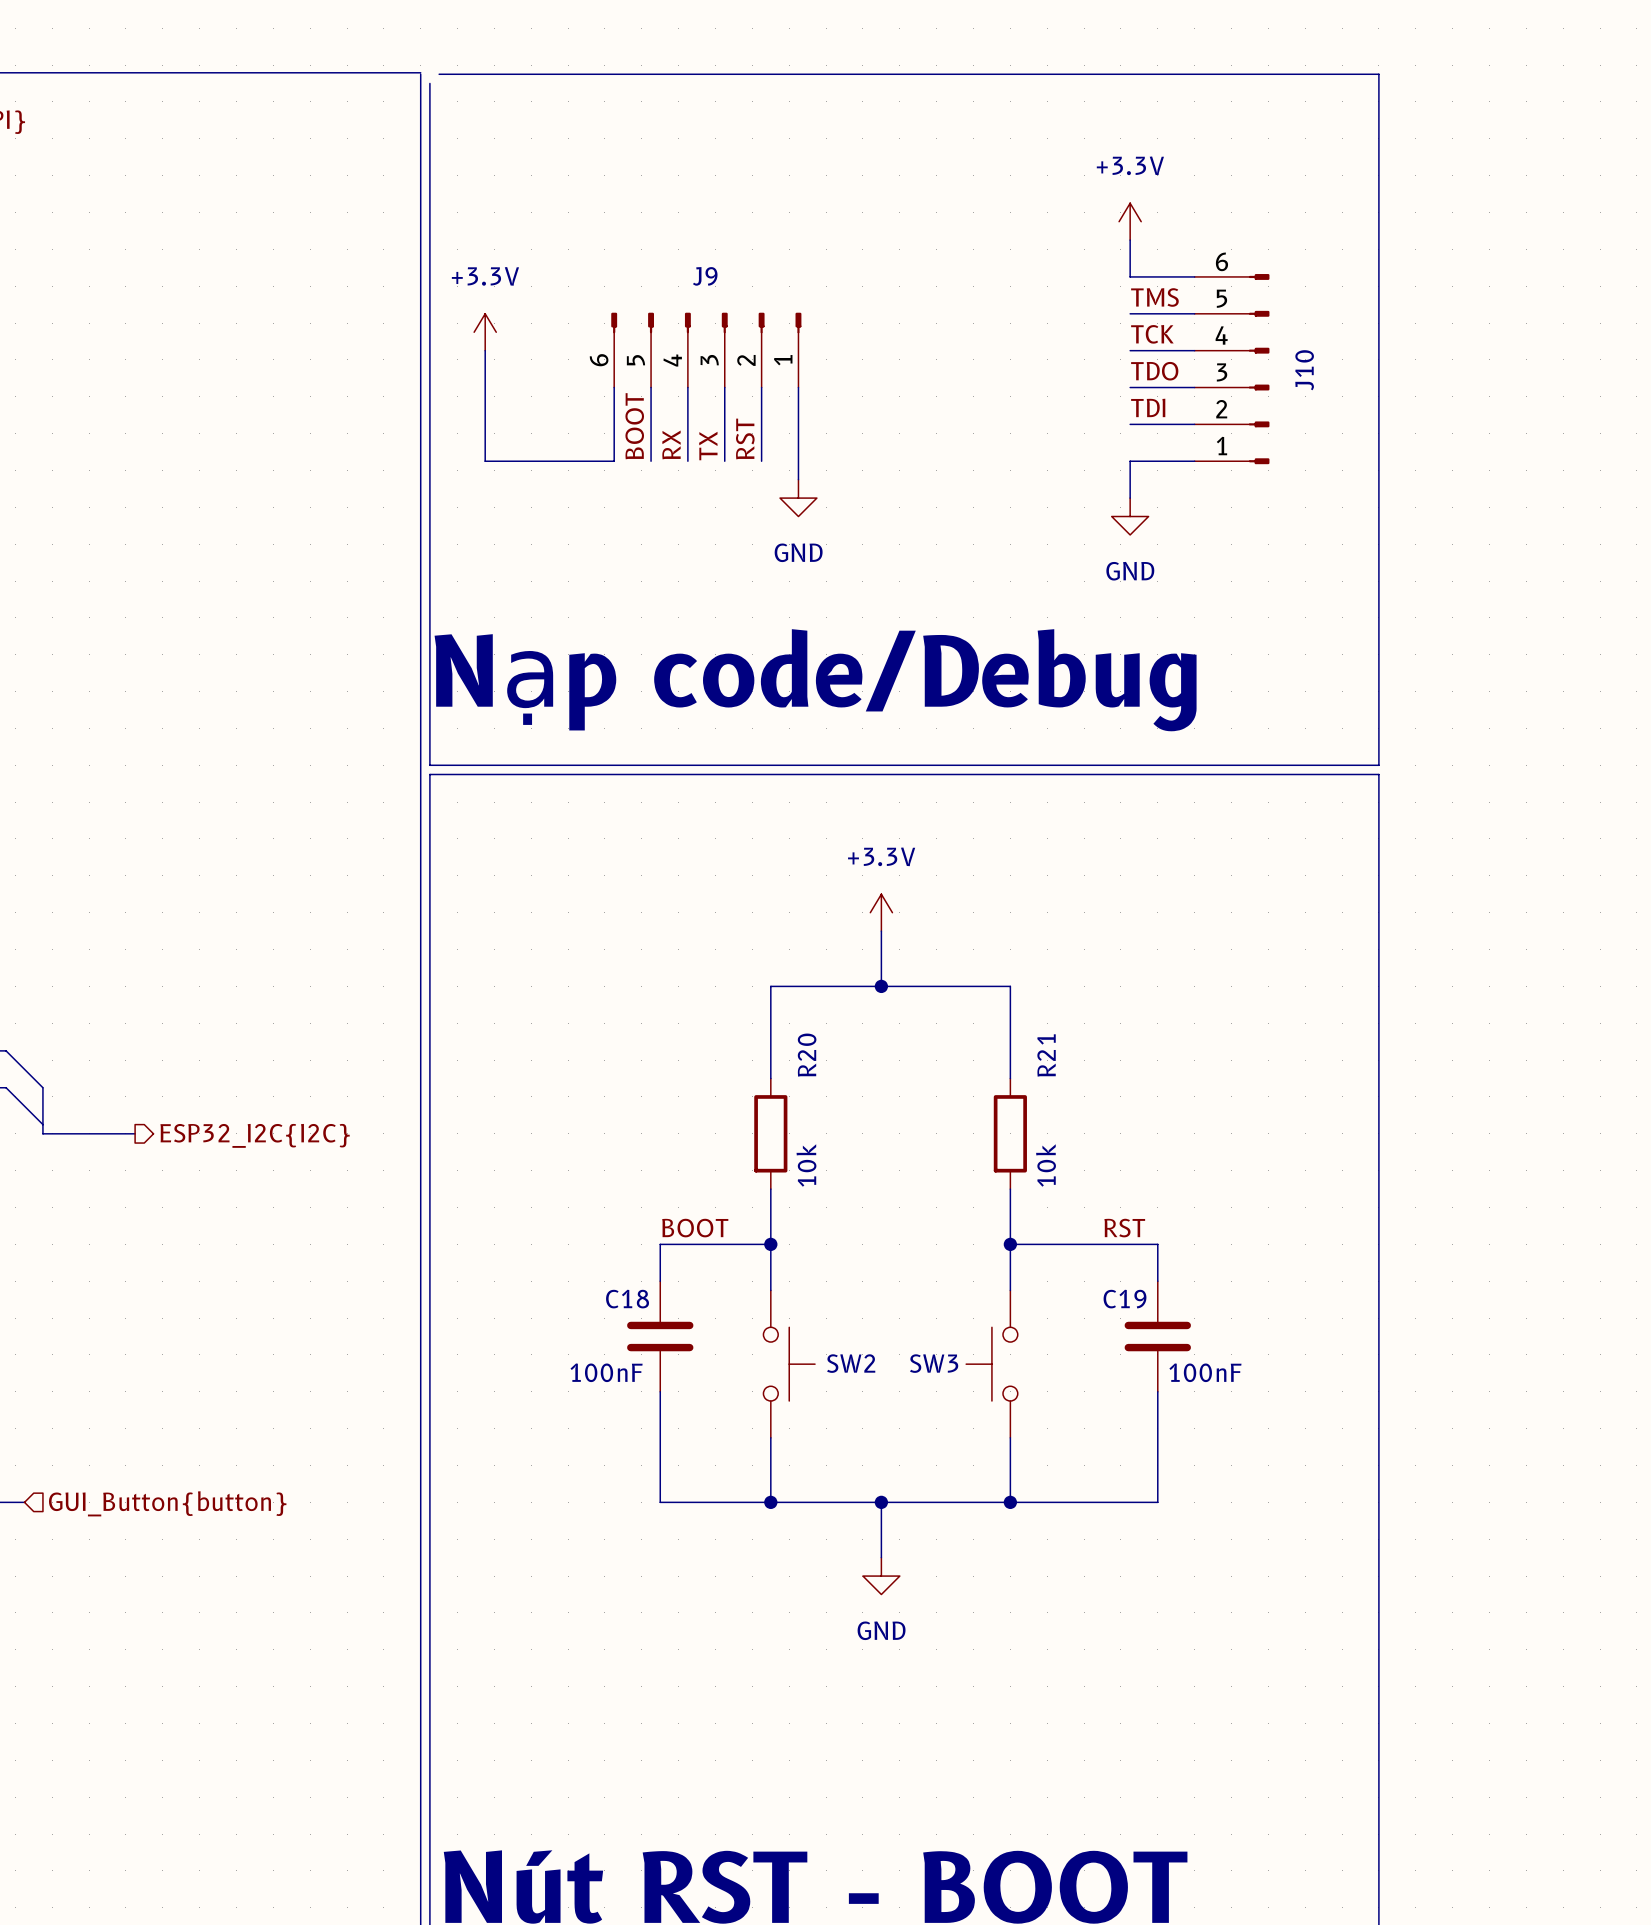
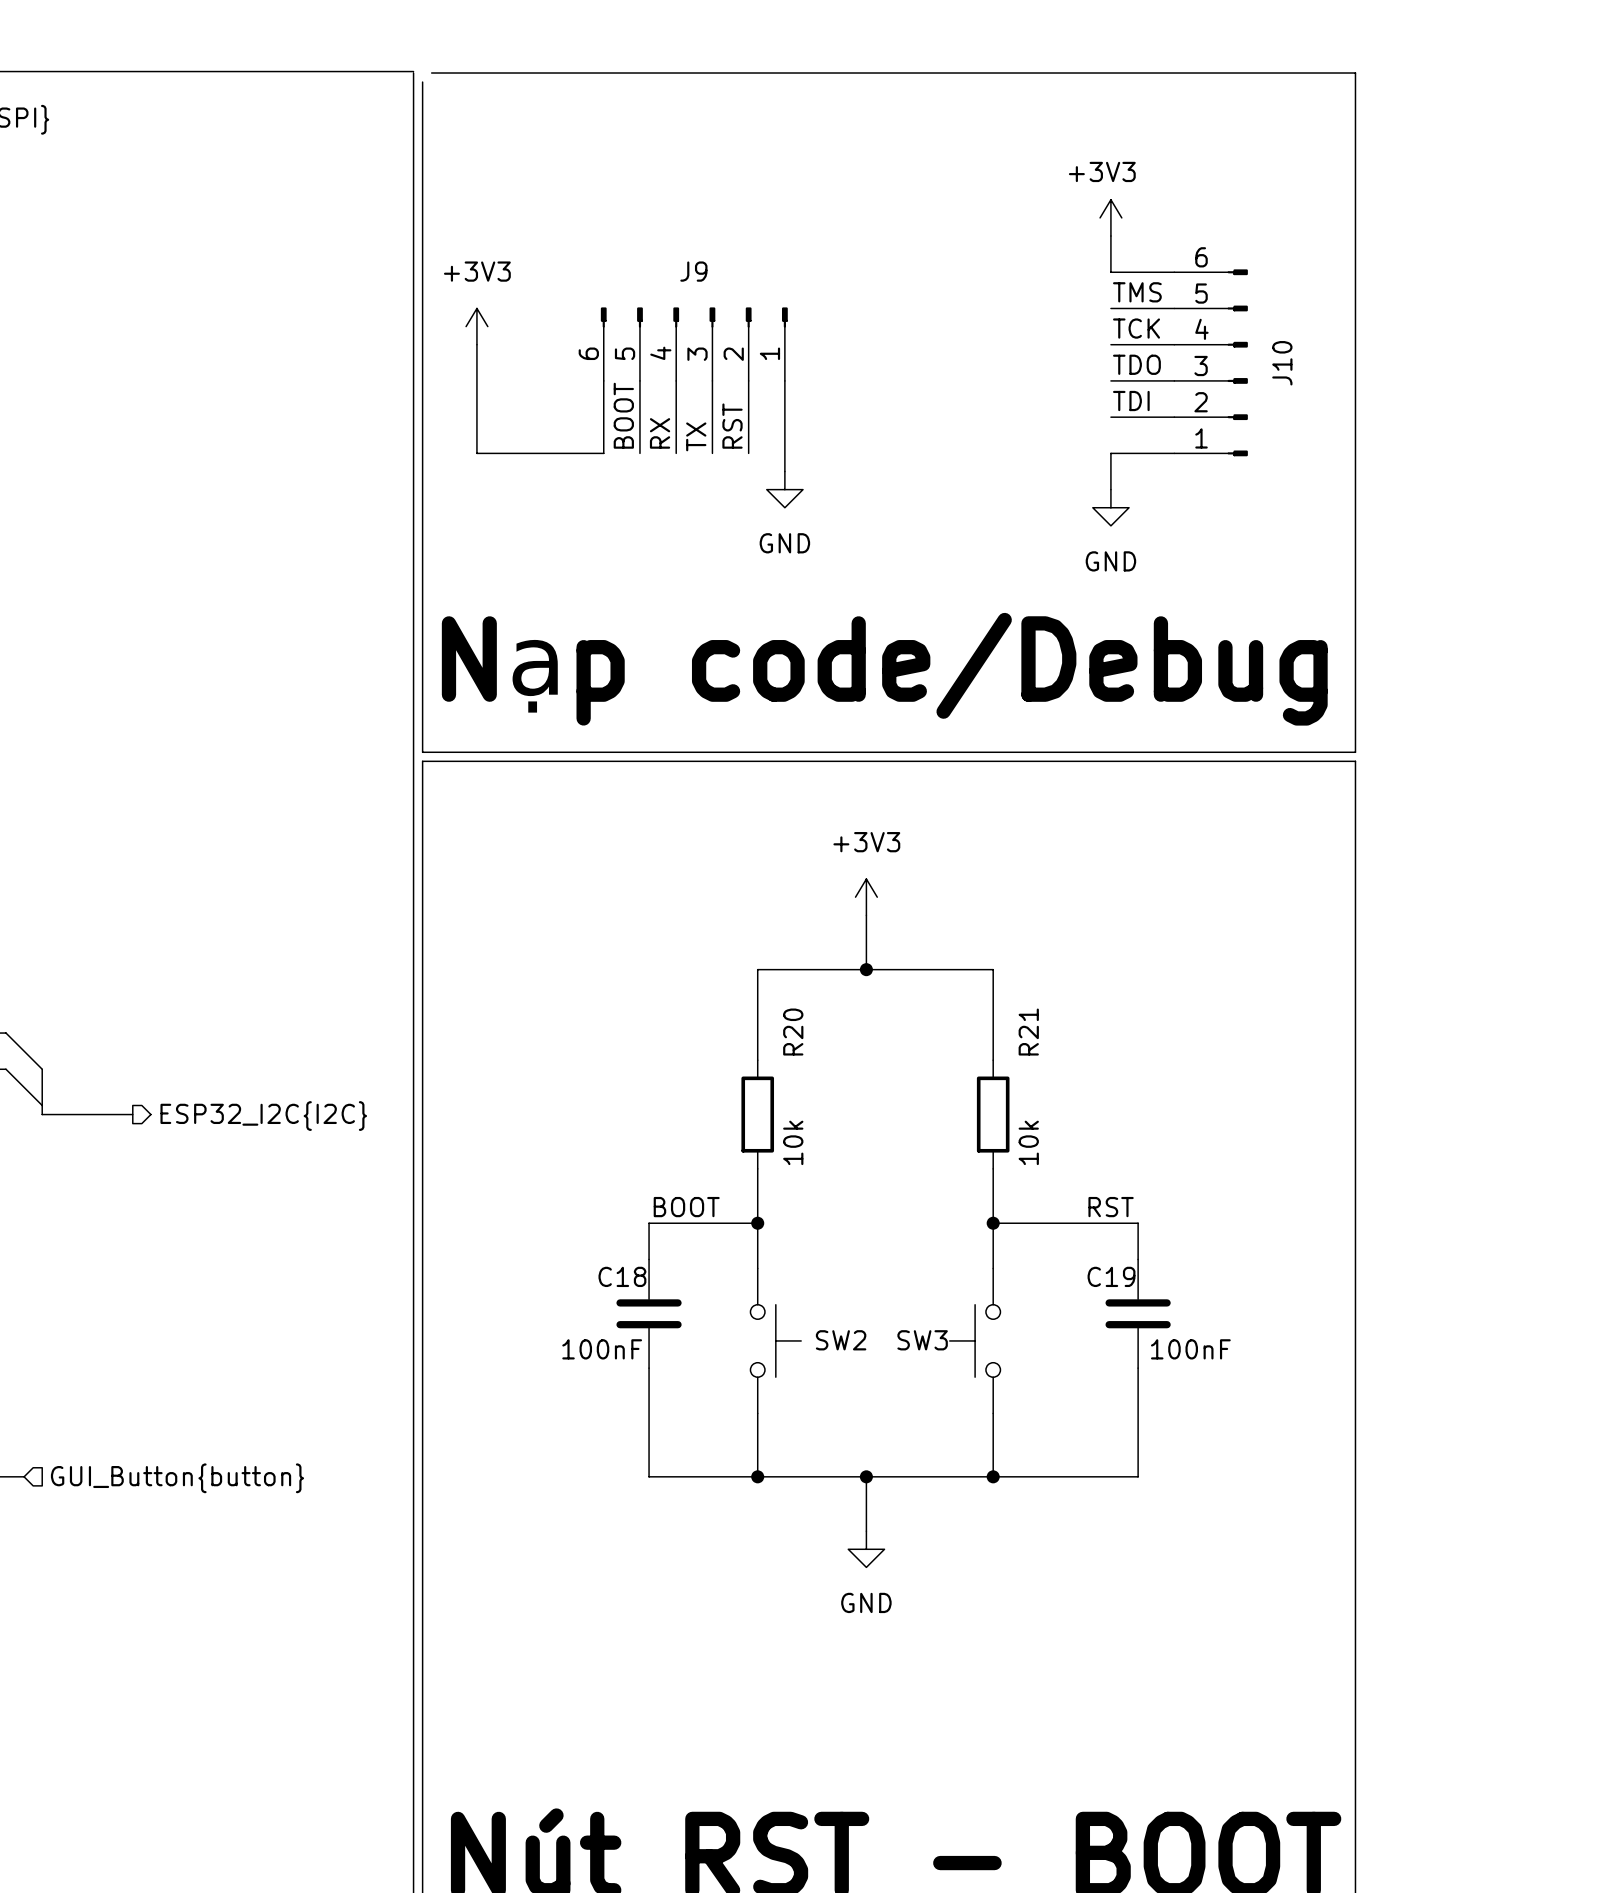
power symbol: +3.3V (1130, 221) -> +3V3 (1110, 217)
power symbol: +3.3V (485, 332) -> +3V3 (476, 326)
power symbol: +3.3V (881, 912) -> +3V3 (866, 897)

